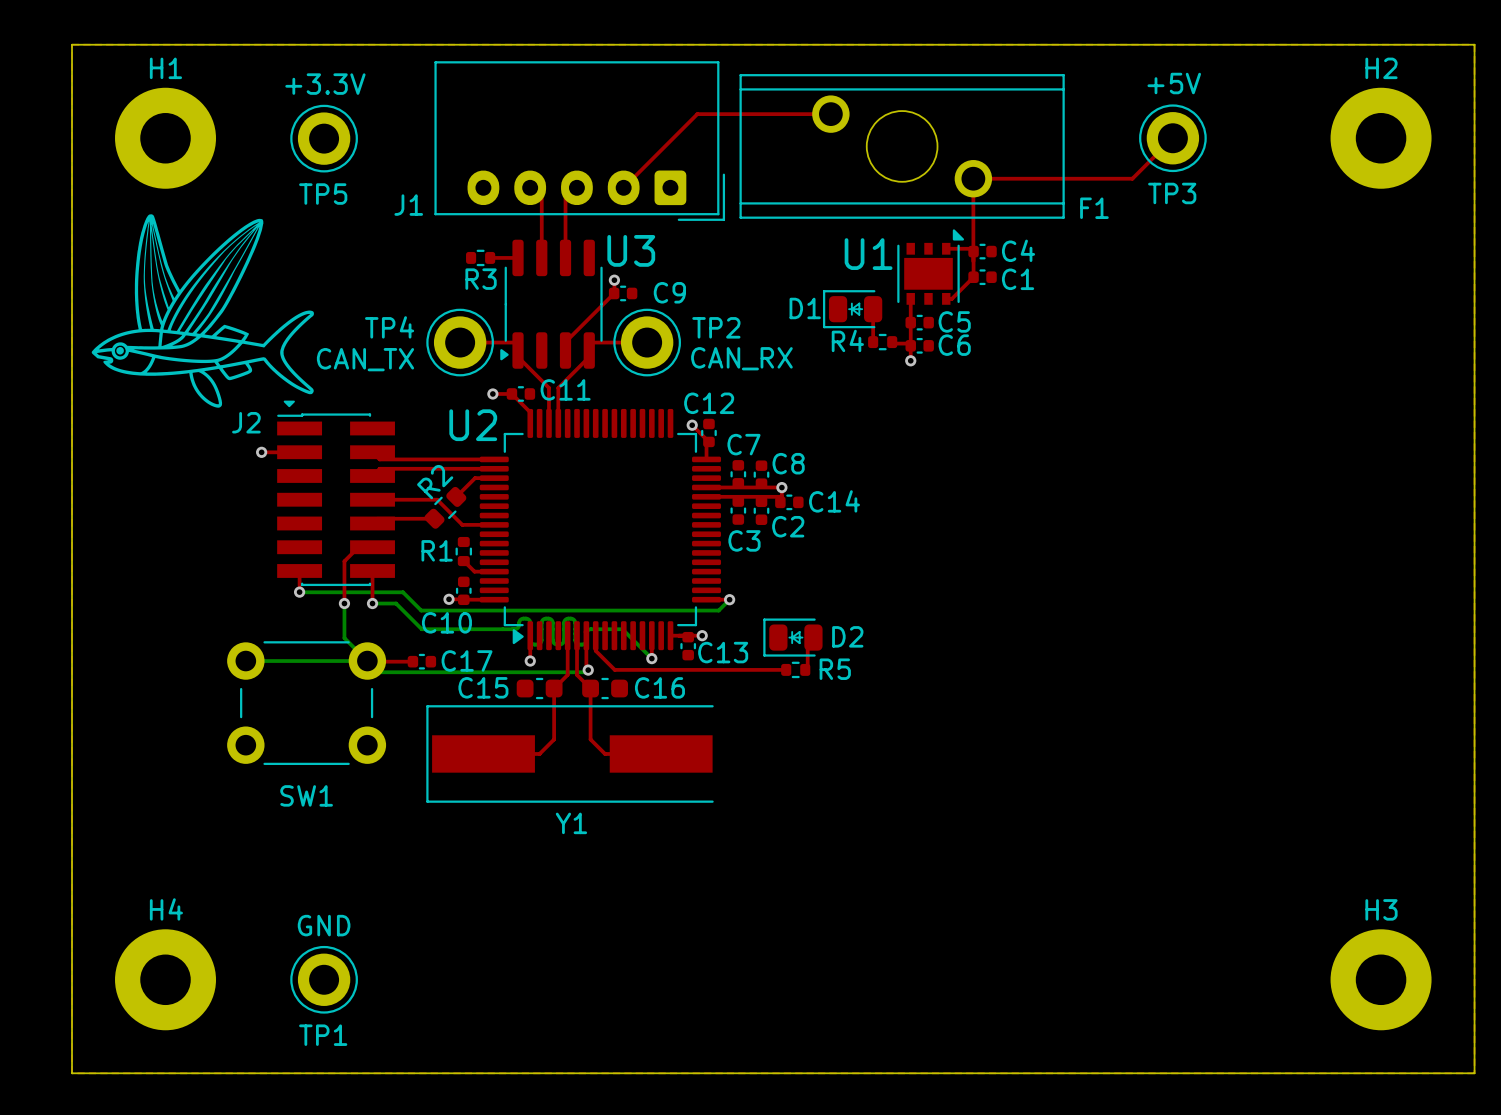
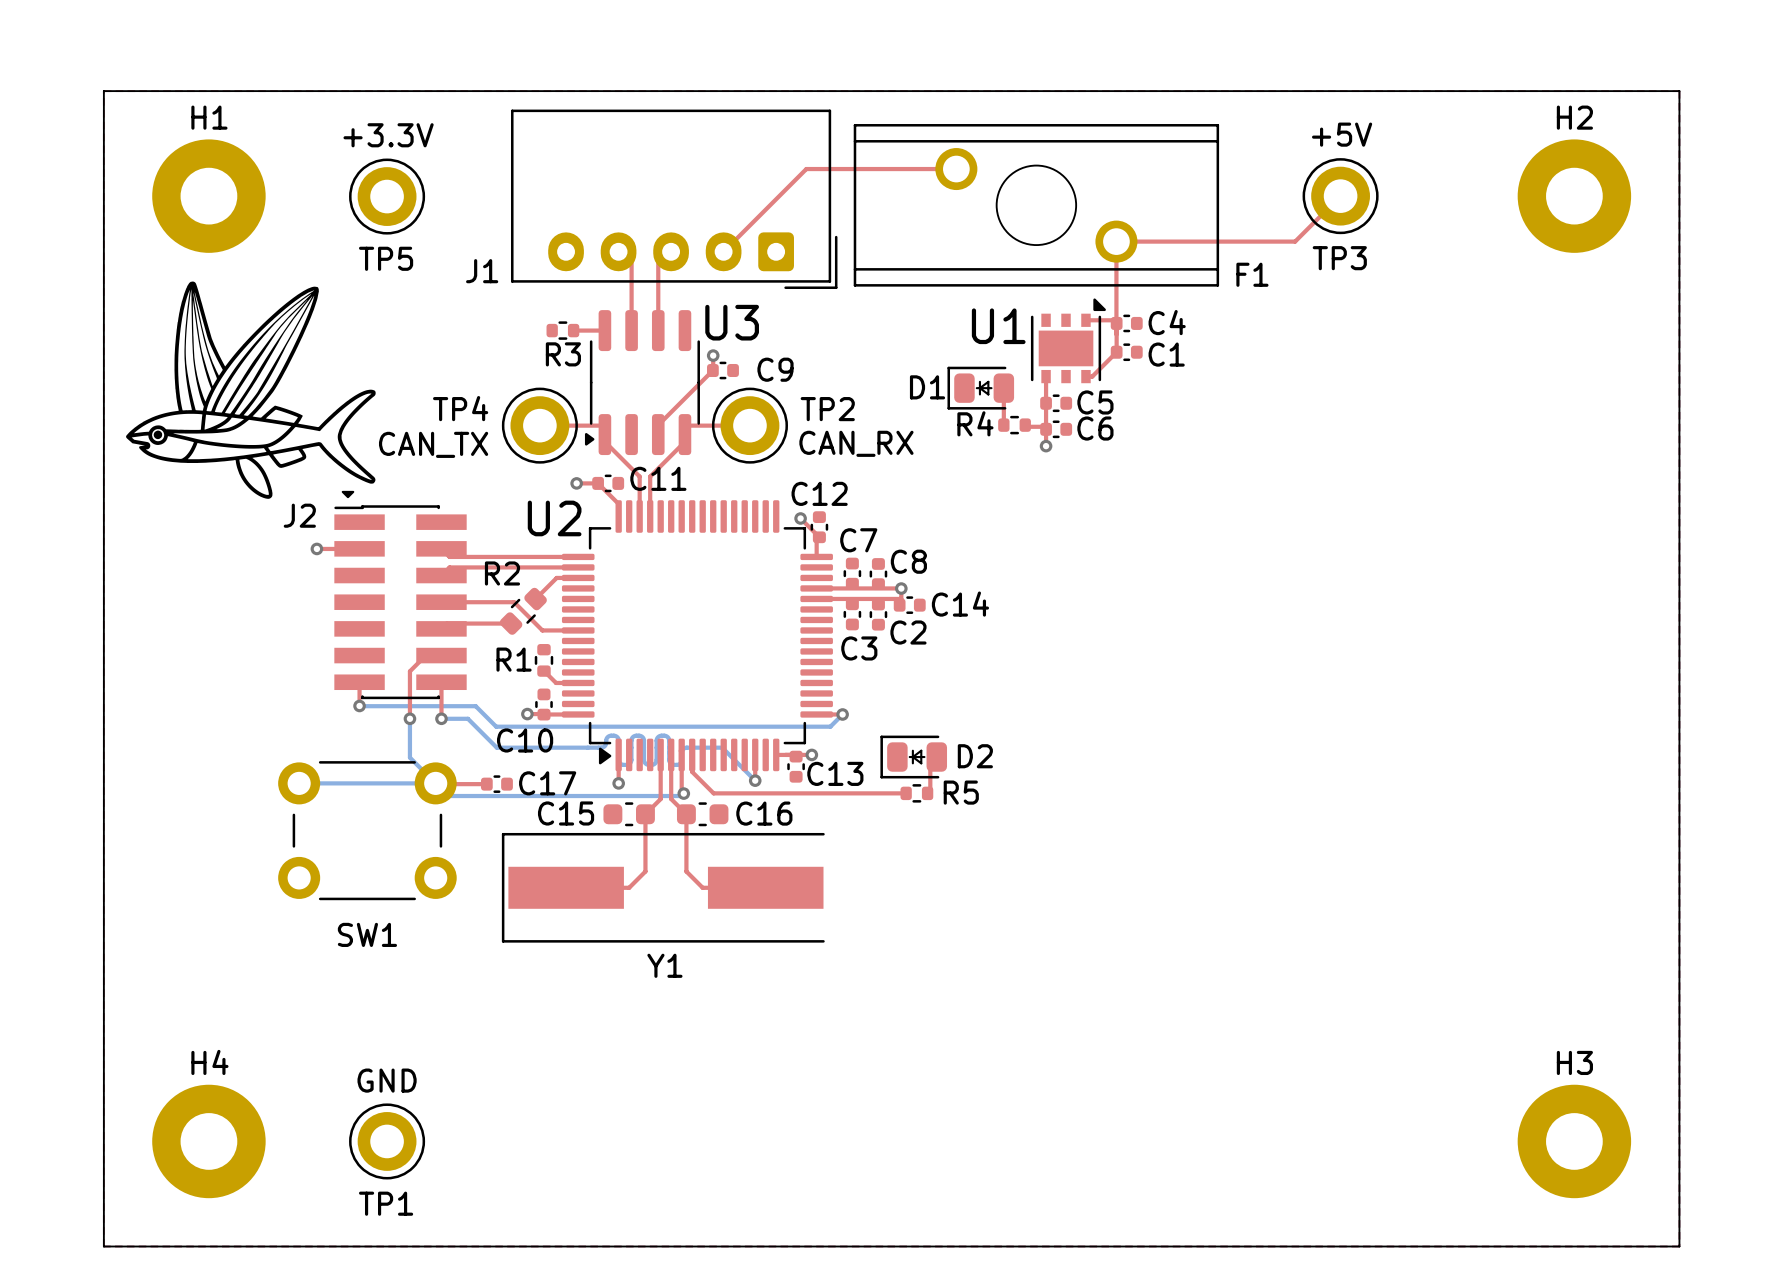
R2 name rotation: 0° (435, 482) -> 45° clockwise (502, 573)

